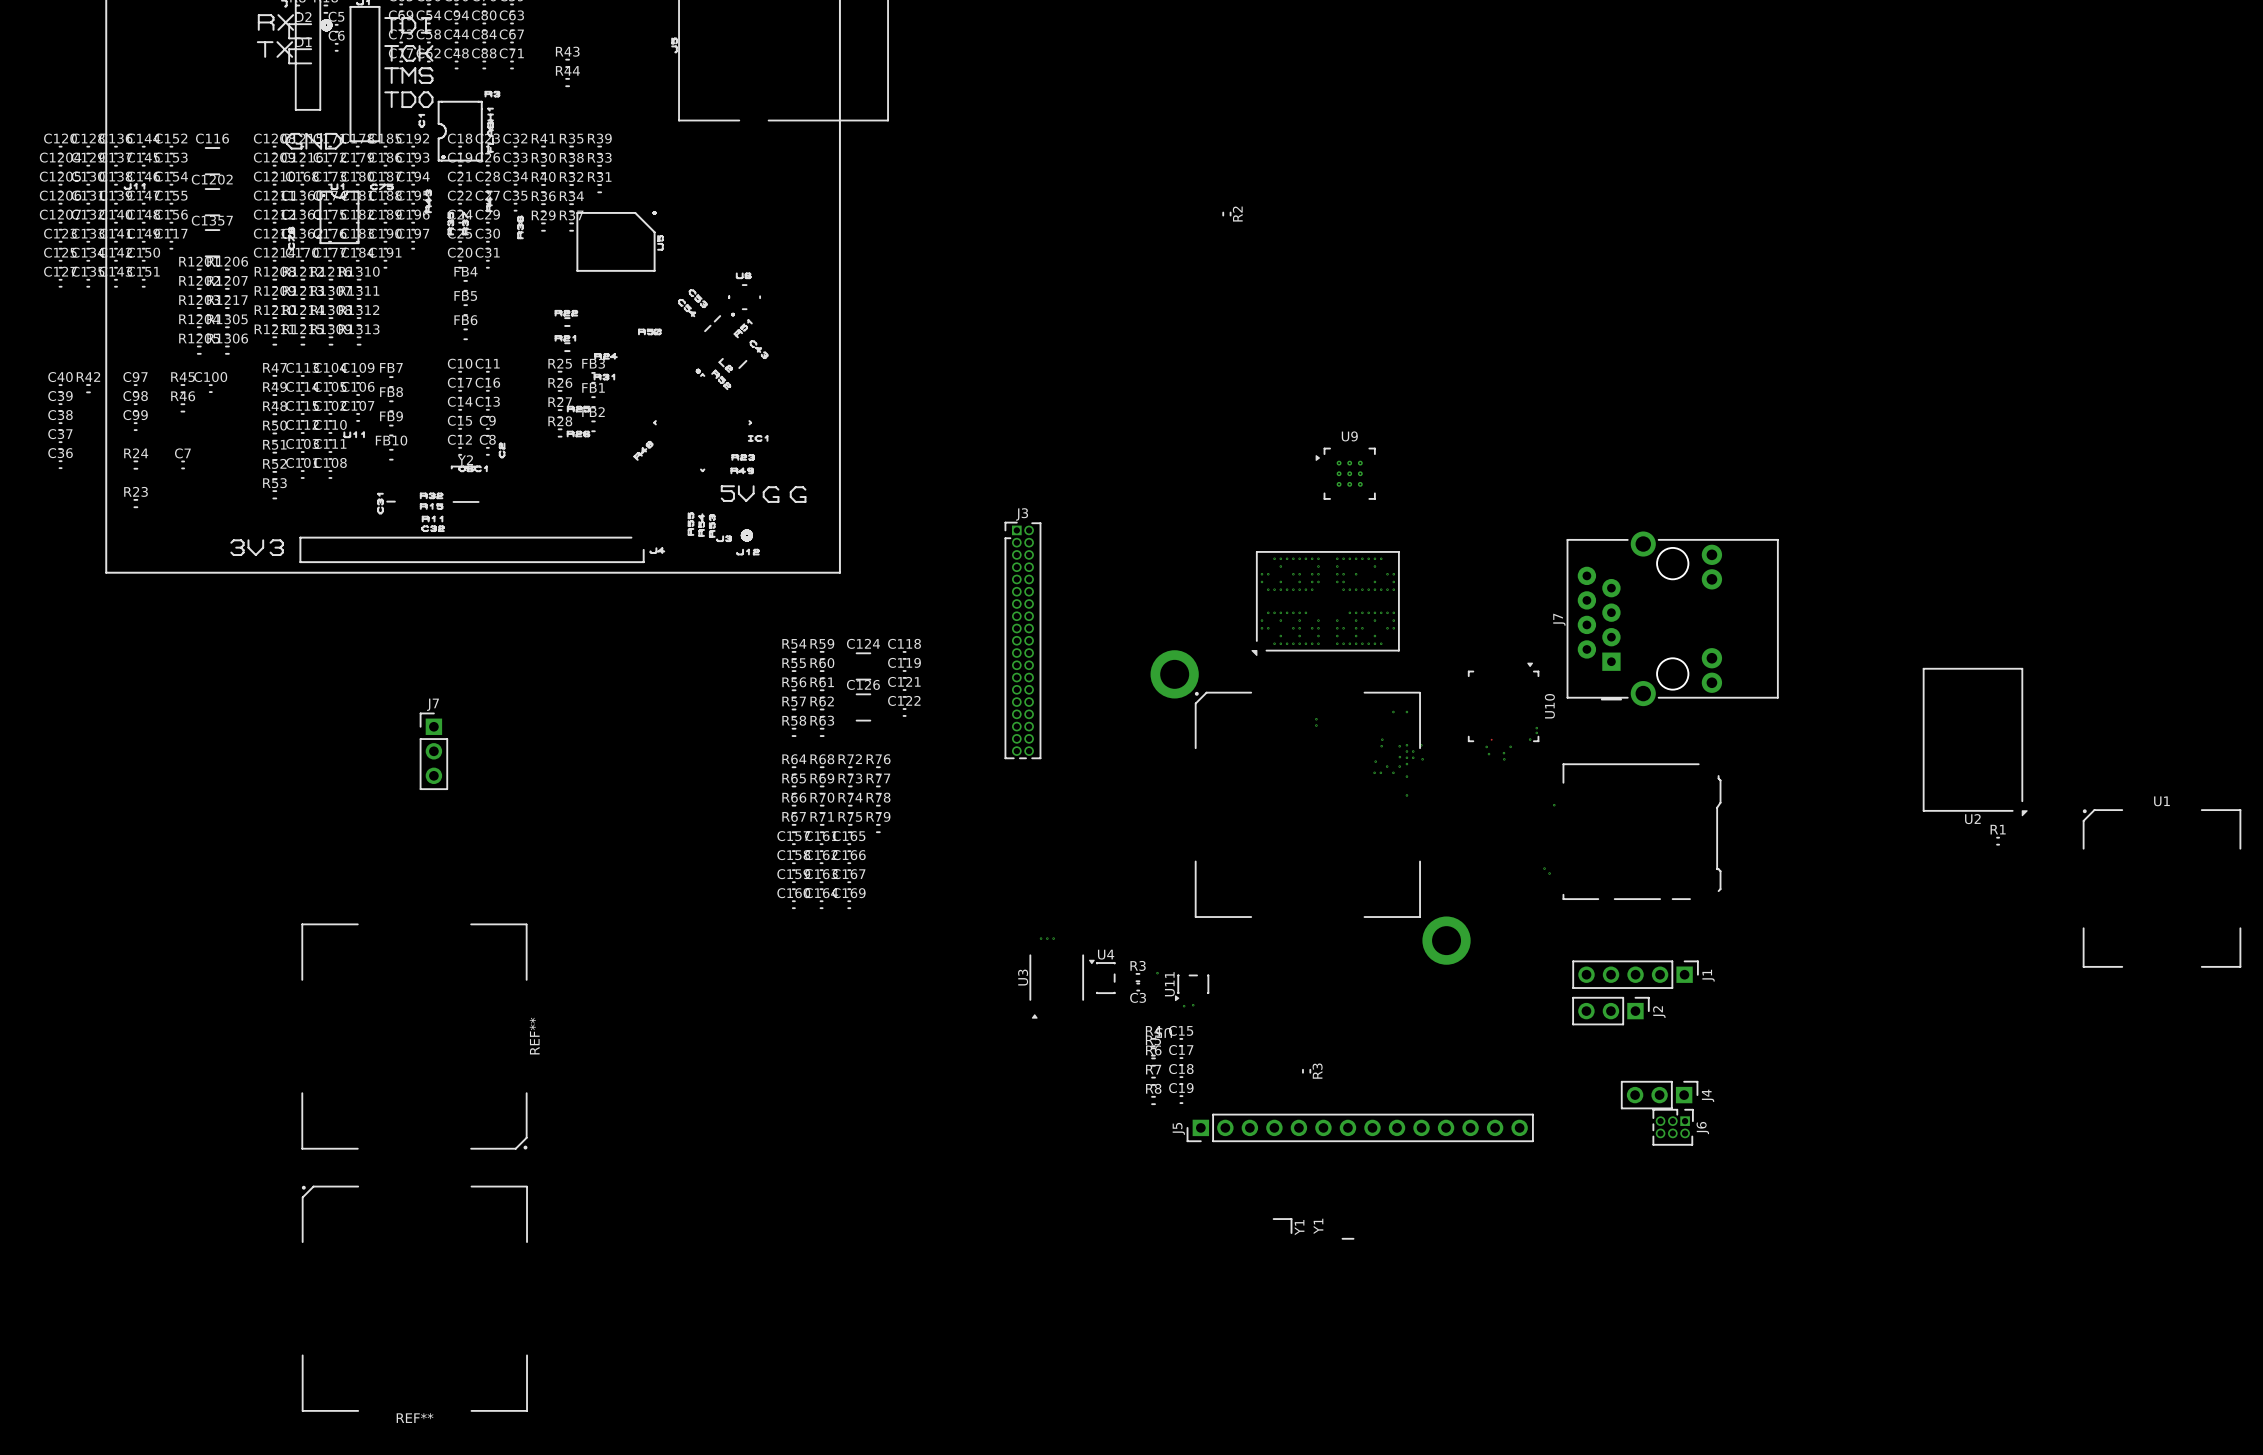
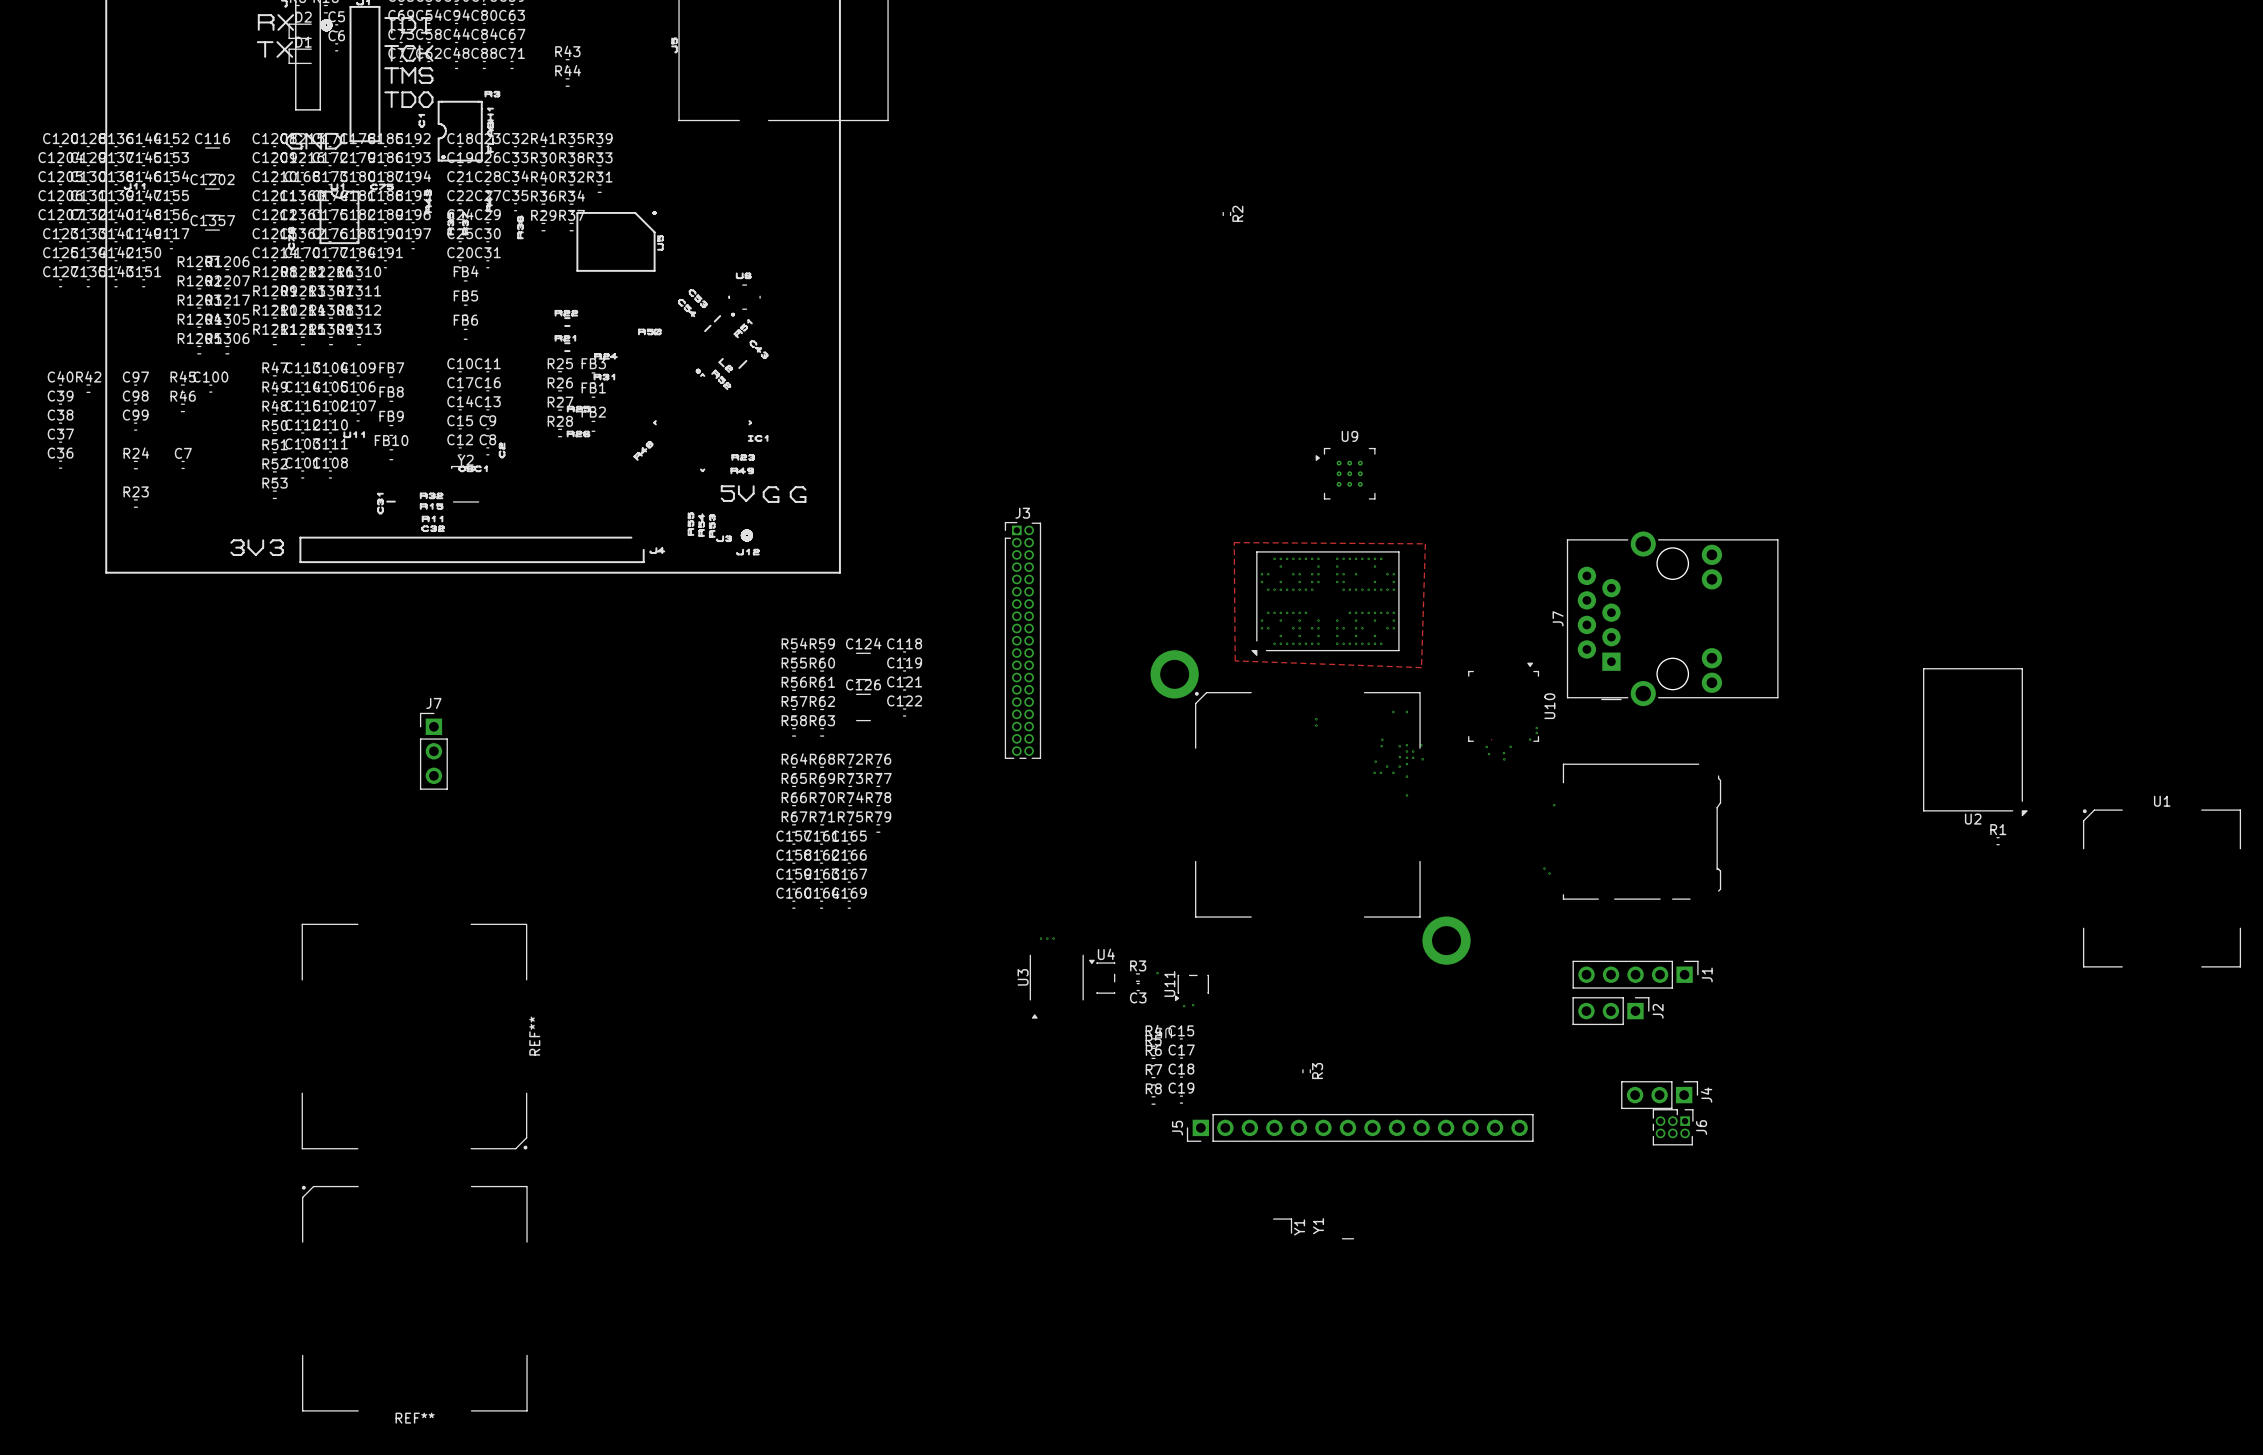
zone outline: none -> (1234, 542) (1425, 543) (1421, 667) (1235, 660) (1234, 542)

